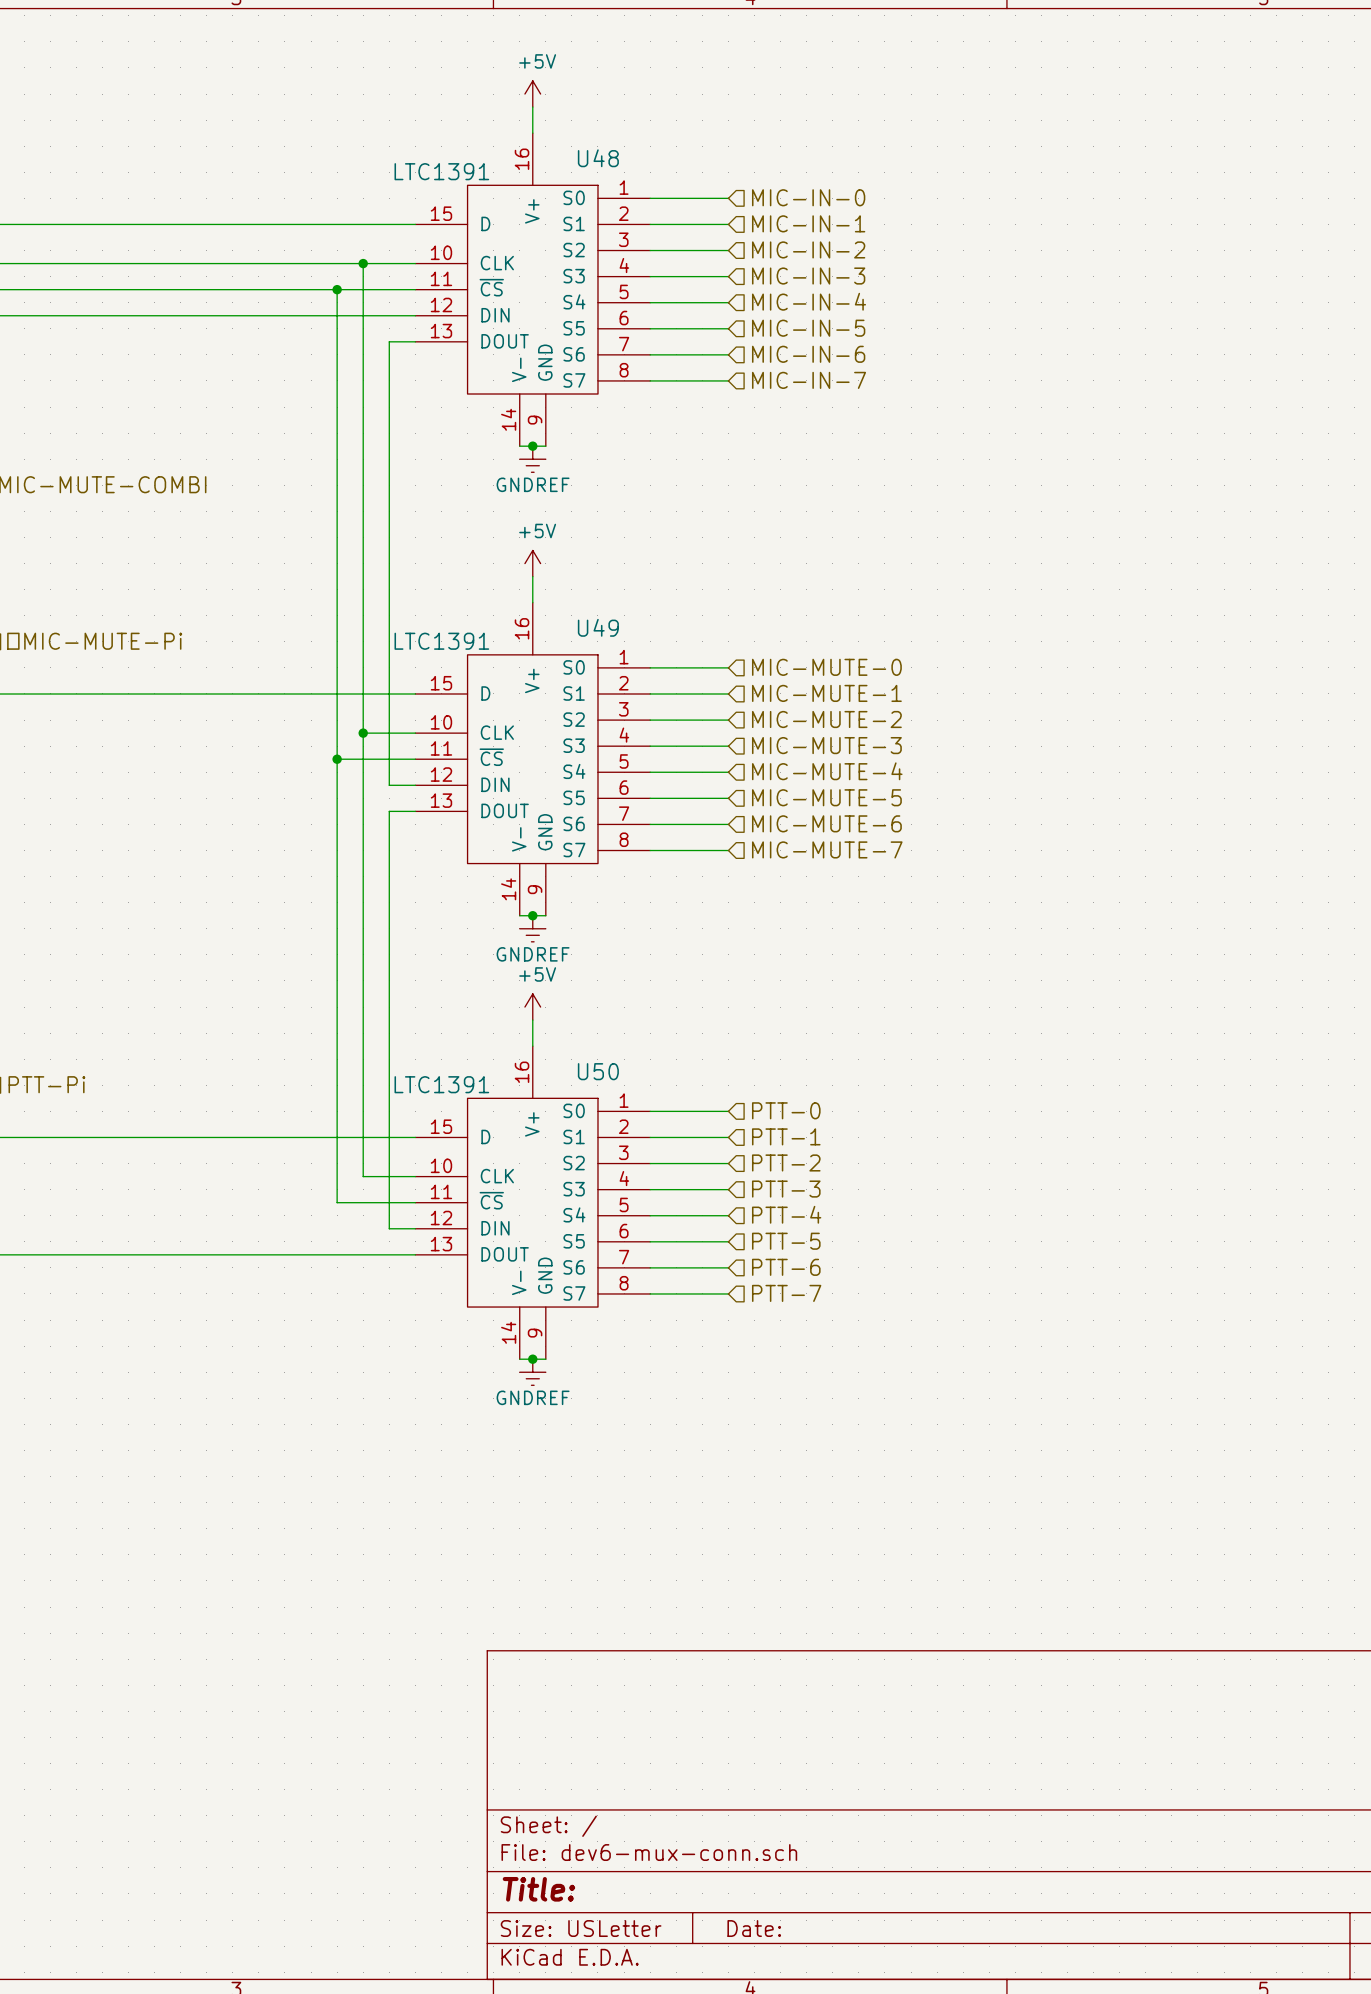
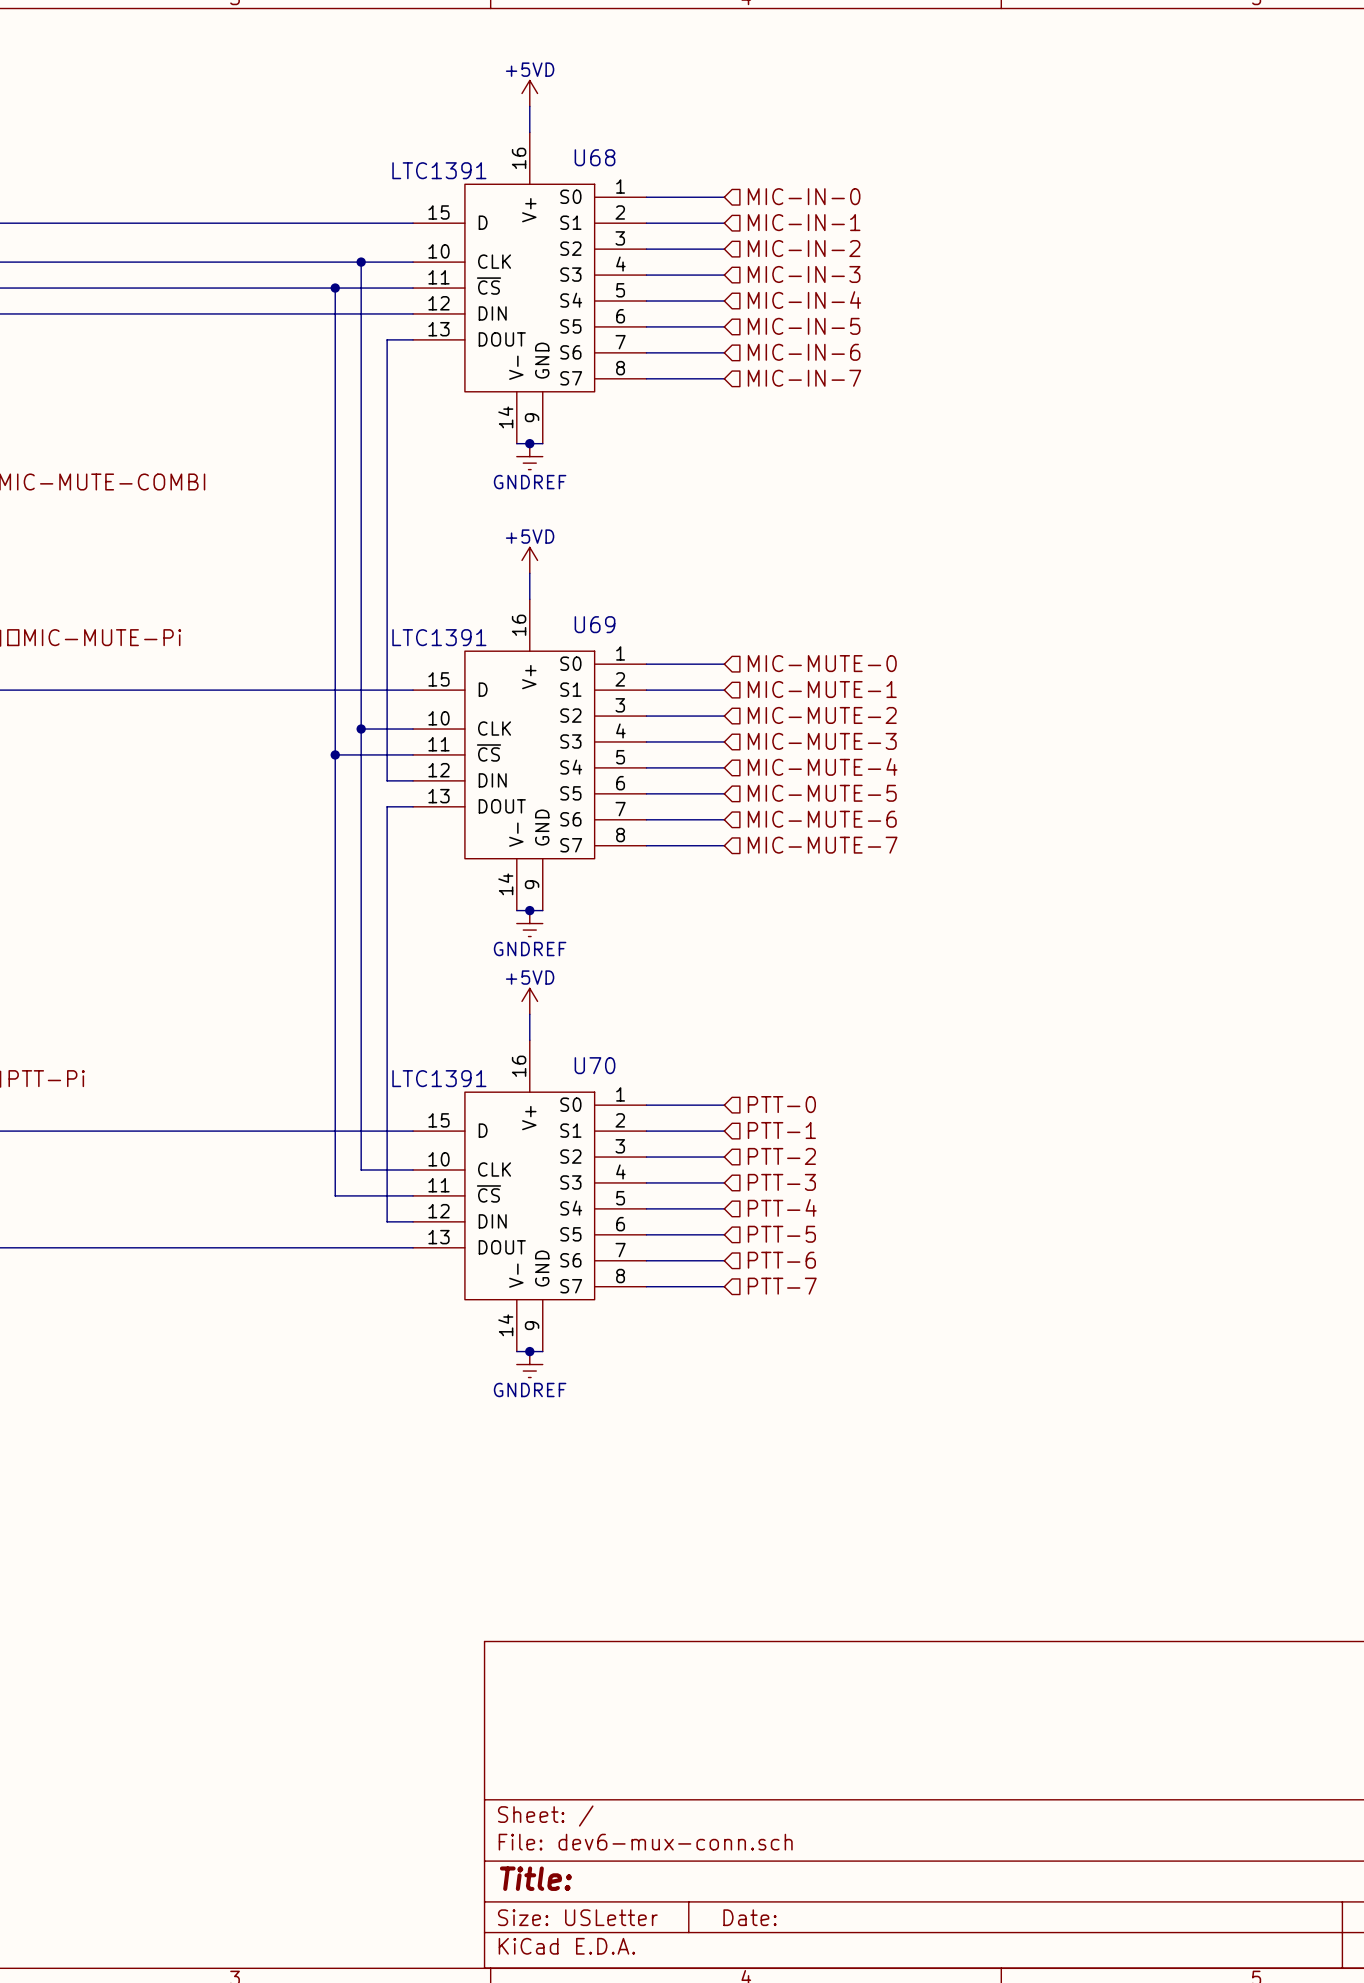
power symbol: +5V (532, 94) -> +5VD (529, 93)
U48 name: U48 (598, 158) -> U68 (595, 157)
power symbol: +5V (532, 563) -> +5VD (529, 560)
U49 name: U49 (598, 627) -> U69 (595, 624)
power symbol: +5V (532, 1007) -> +5VD (529, 1001)
U50 name: U50 (598, 1071) -> U70 (595, 1065)

